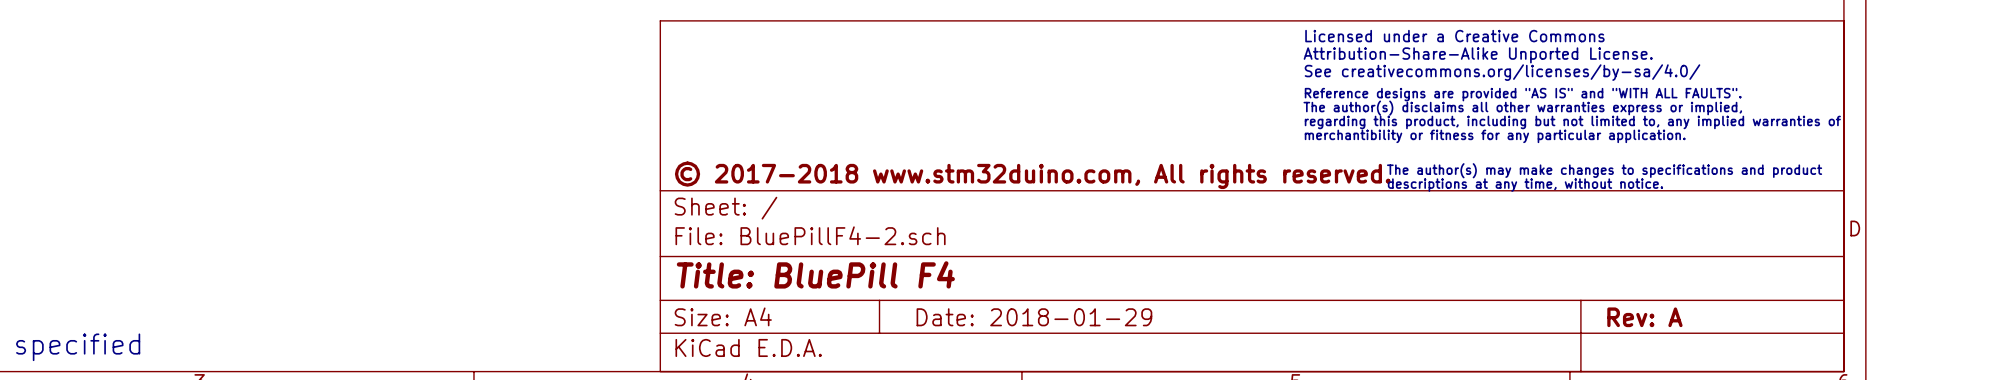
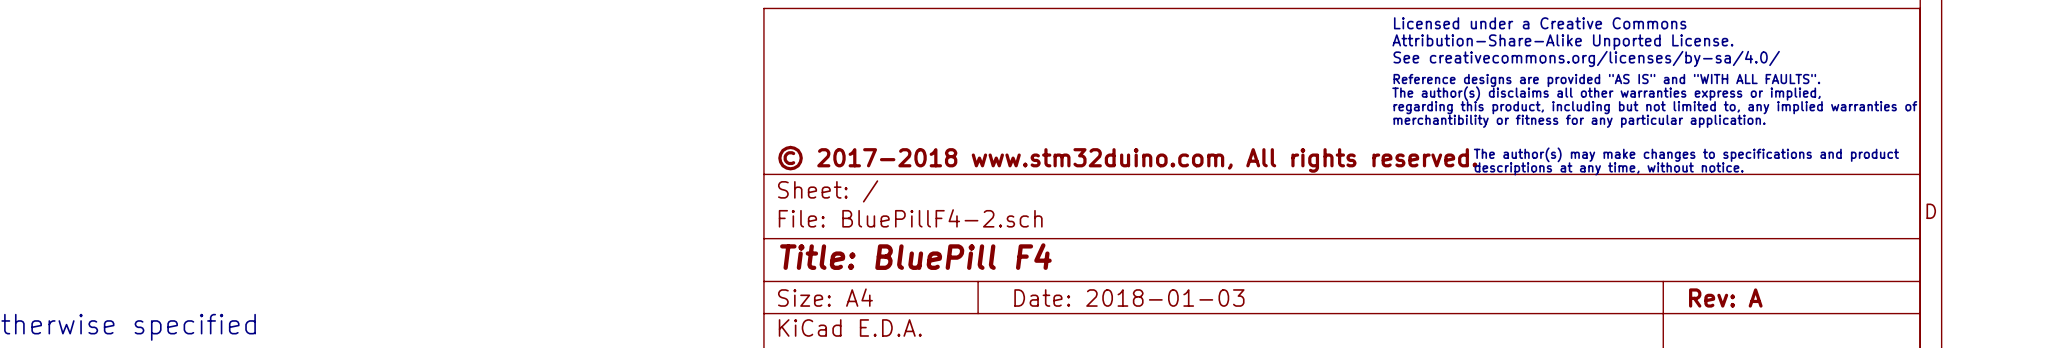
title block: Date: 2018-01-29 (1034, 317) -> Date: 2018-01-03 (1129, 298)

